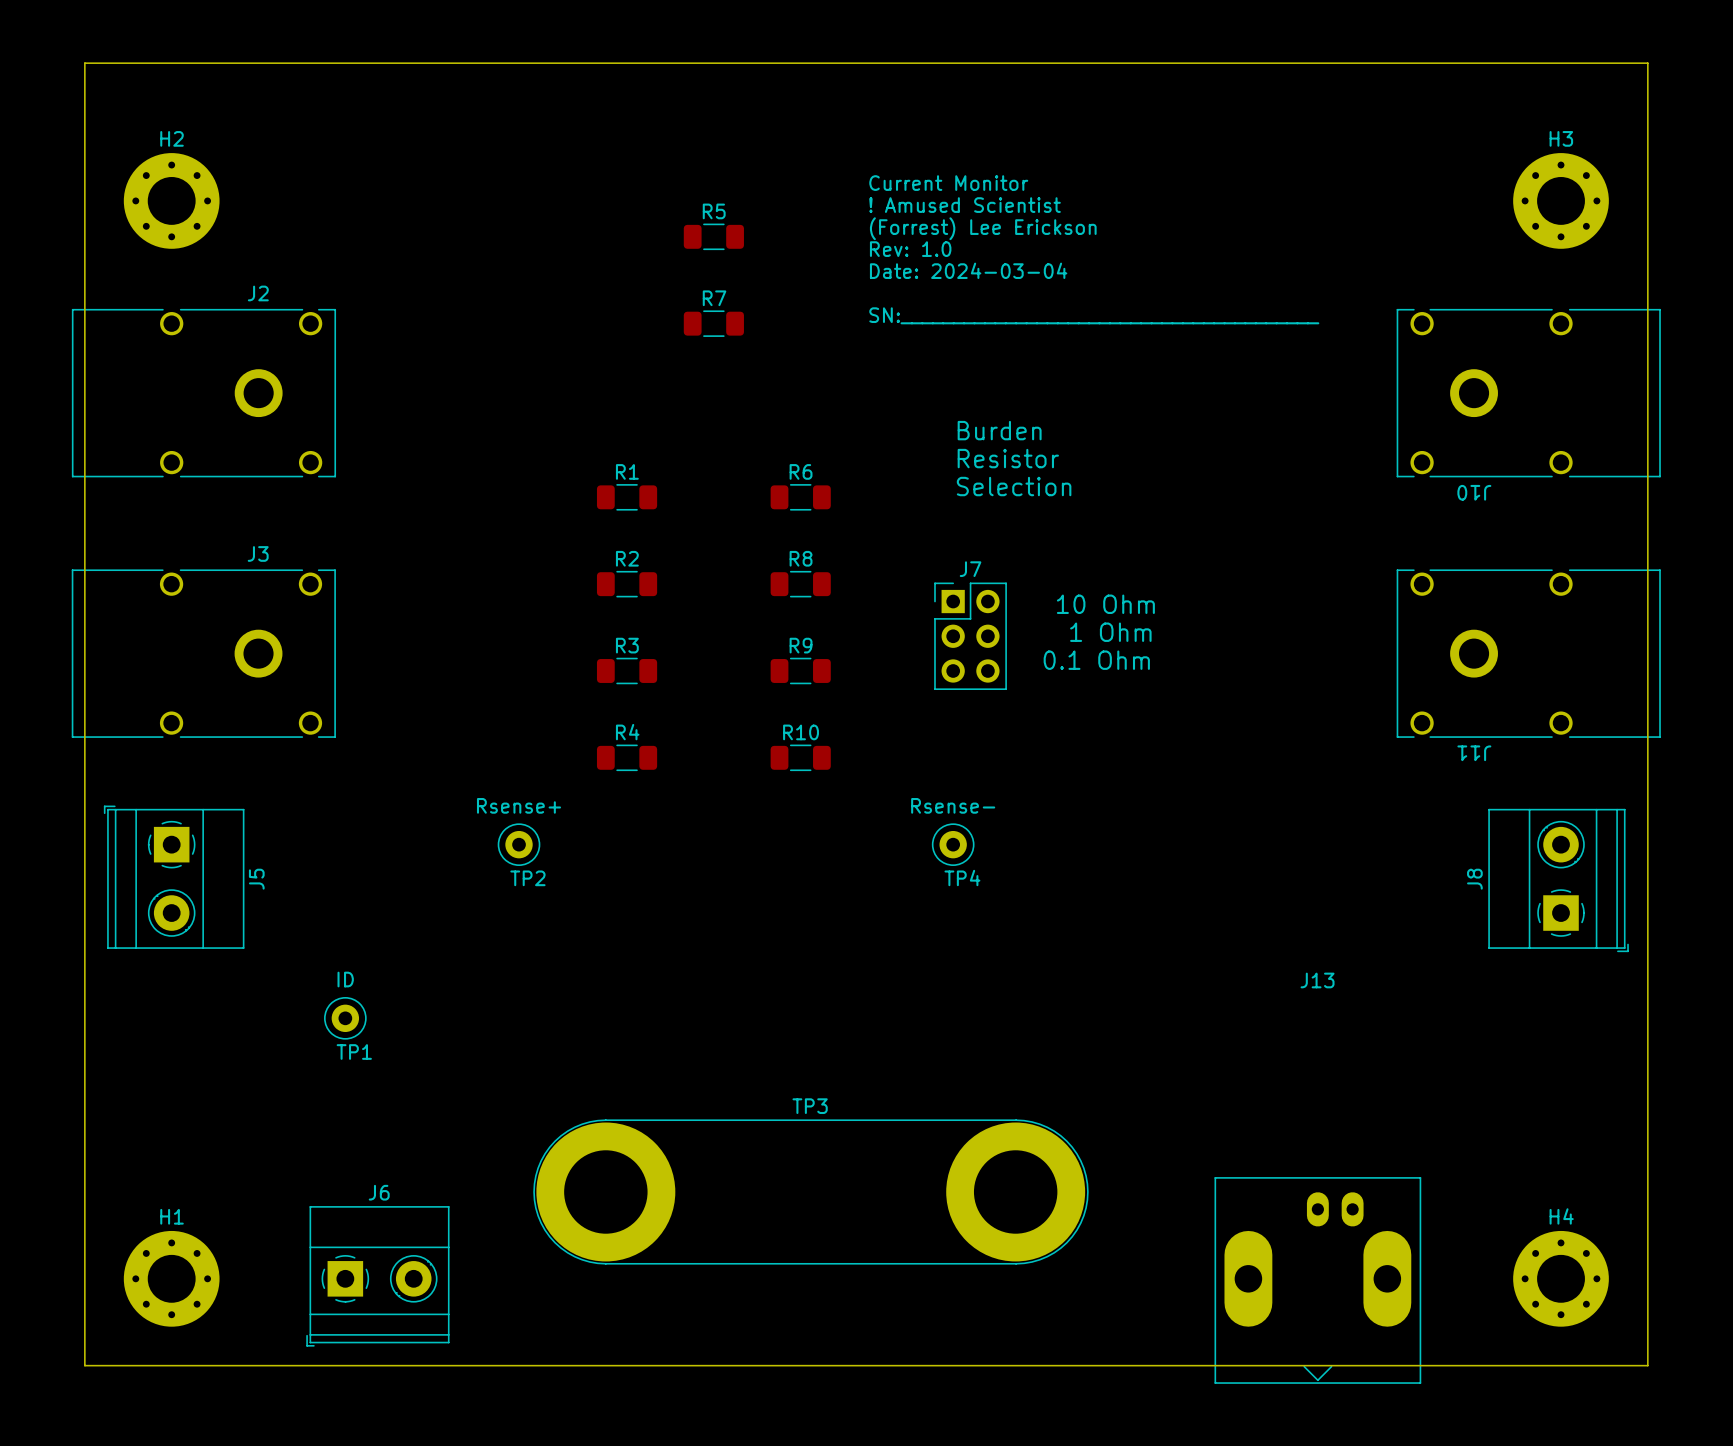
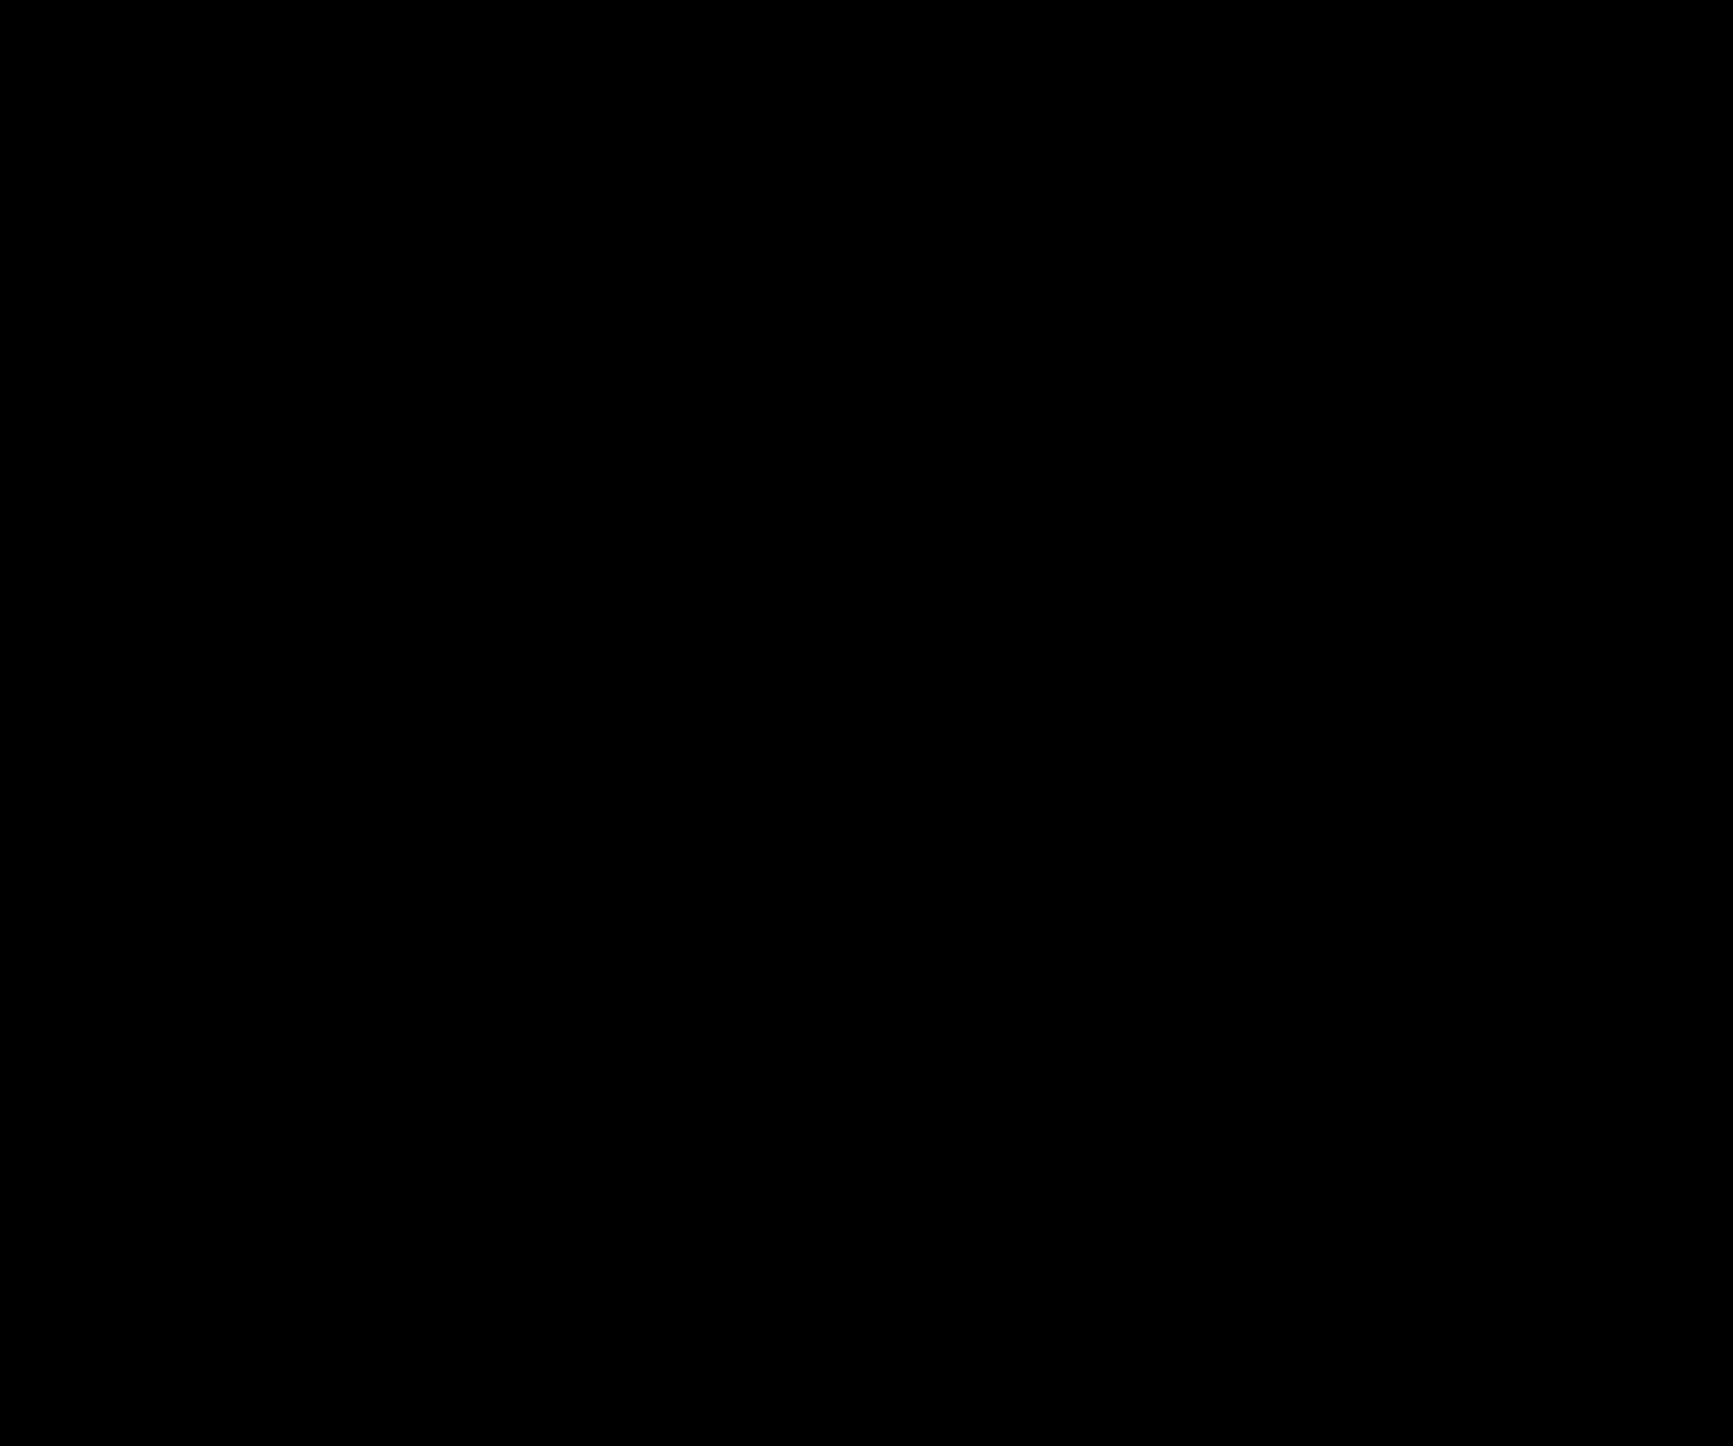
board edge: (84, 63) (84, 1365) (1647, 1365) (1647, 63) (84, 63) -> none
text: Current Monitor (948, 183) -> none
H2: (171, 200) -> none
H3: (1561, 200) -> none
text: ! Amused Scientist (965, 205) -> none
text: (Forrest) Lee Erickson (983, 228) -> none
R5: (713, 236) -> none
text: Rev: 1.0 (910, 249) -> none
text: Date: 2024-03-04 (968, 270) -> none
text: SN:________________________________________ (1094, 315) -> none
R7: (713, 323) -> none
J2: (203, 393) -> none
J10: (1528, 393) -> none
text: Burden (999, 430) -> none
text: Resistor (1008, 458) -> none
text: Selection (1014, 486) -> none
R1: (627, 497) -> none
R6: (800, 497) -> none
R2: (627, 584) -> none
R8: (800, 584) -> none
text: 10 Ohm (1105, 604) -> none
text: 1 Ohm (1110, 632) -> none
J7: (970, 636) -> none
J3: (203, 653) -> none
J11: (1528, 653) -> none
text: 0.1 Ohm (1096, 660) -> none
R3: (627, 670) -> none
R9: (800, 670) -> none
R4: (627, 757) -> none
R10: (800, 757) -> none
TP2: Rsense+ (519, 844) -> none
TP4: Rsense- (953, 844) -> none
J5: (174, 877) -> none
J8: (1558, 880) -> none
TP1: ID (345, 1018) -> none
TP3: (810, 1191) -> none
J6: (377, 1276) -> none
H1: (171, 1278) -> none
H4: (1561, 1278) -> none
J13: (1317, 1280) -> none

